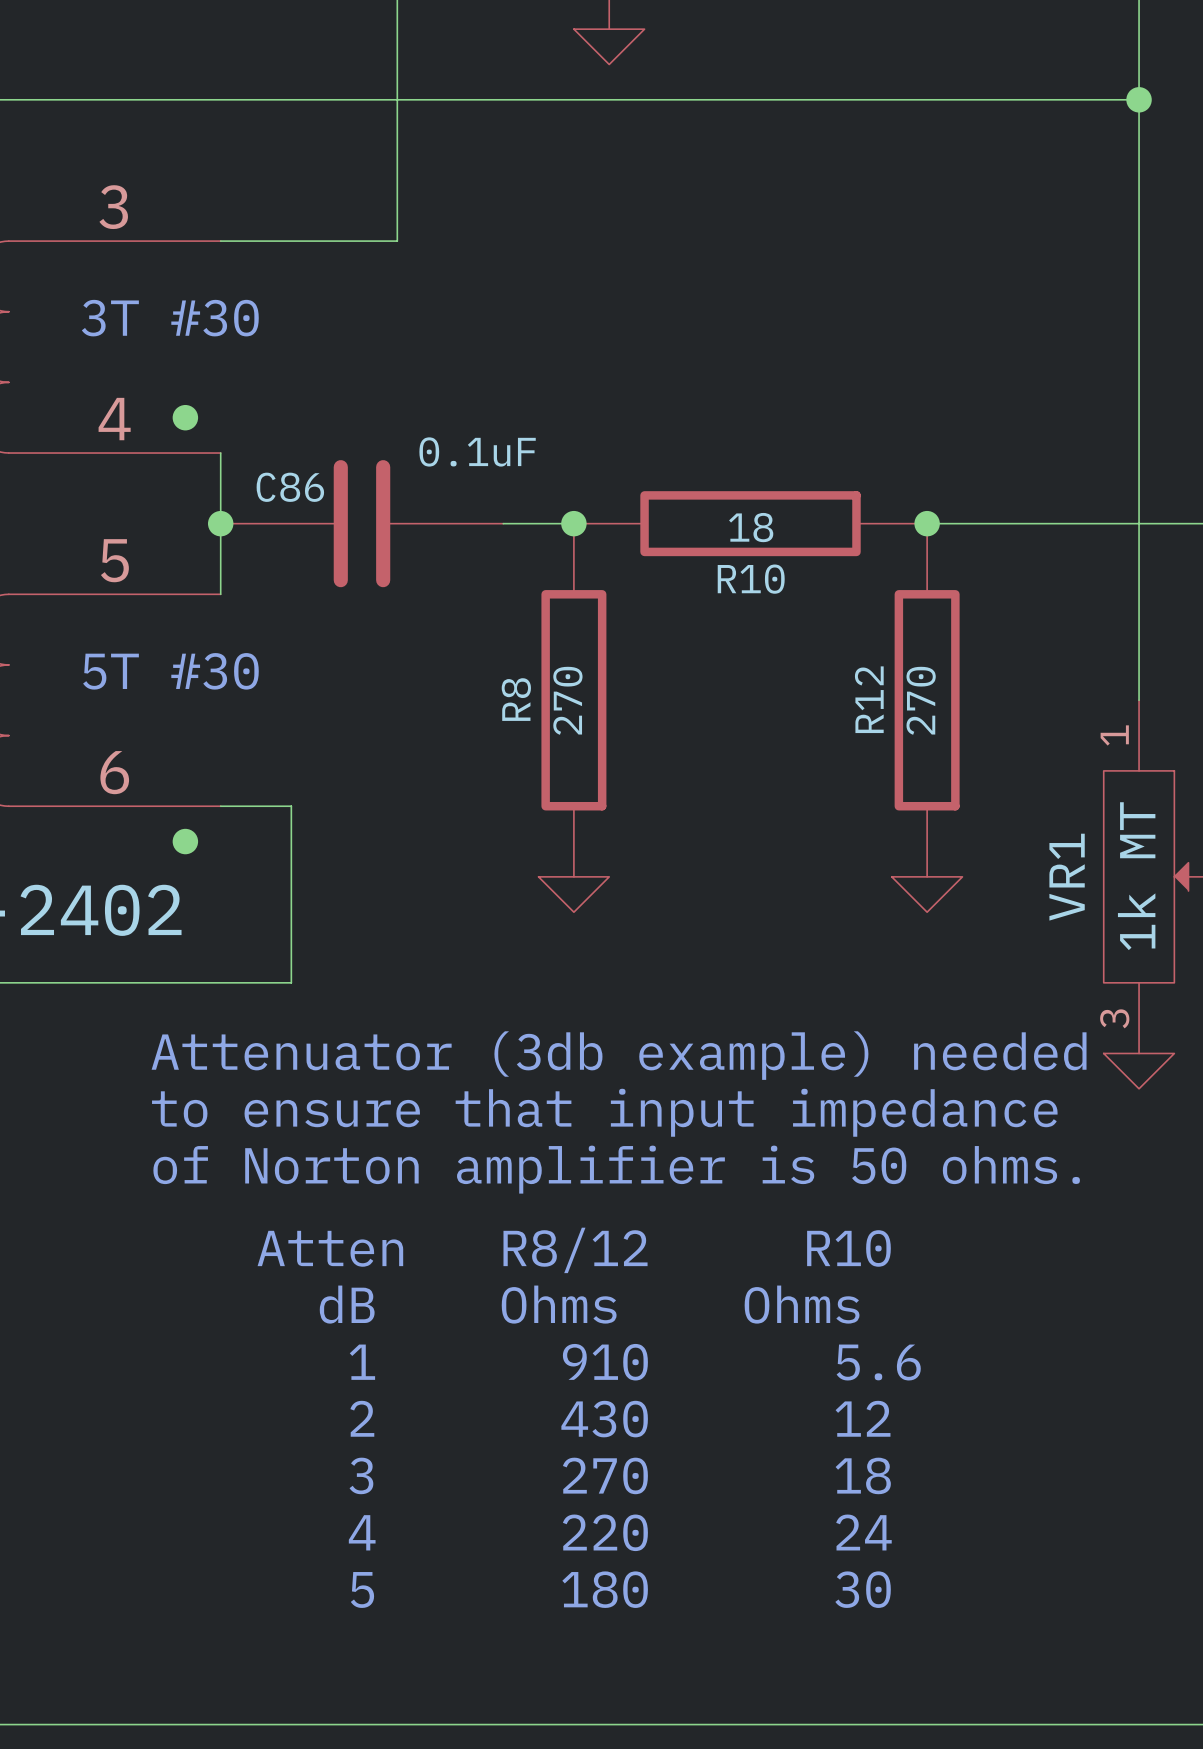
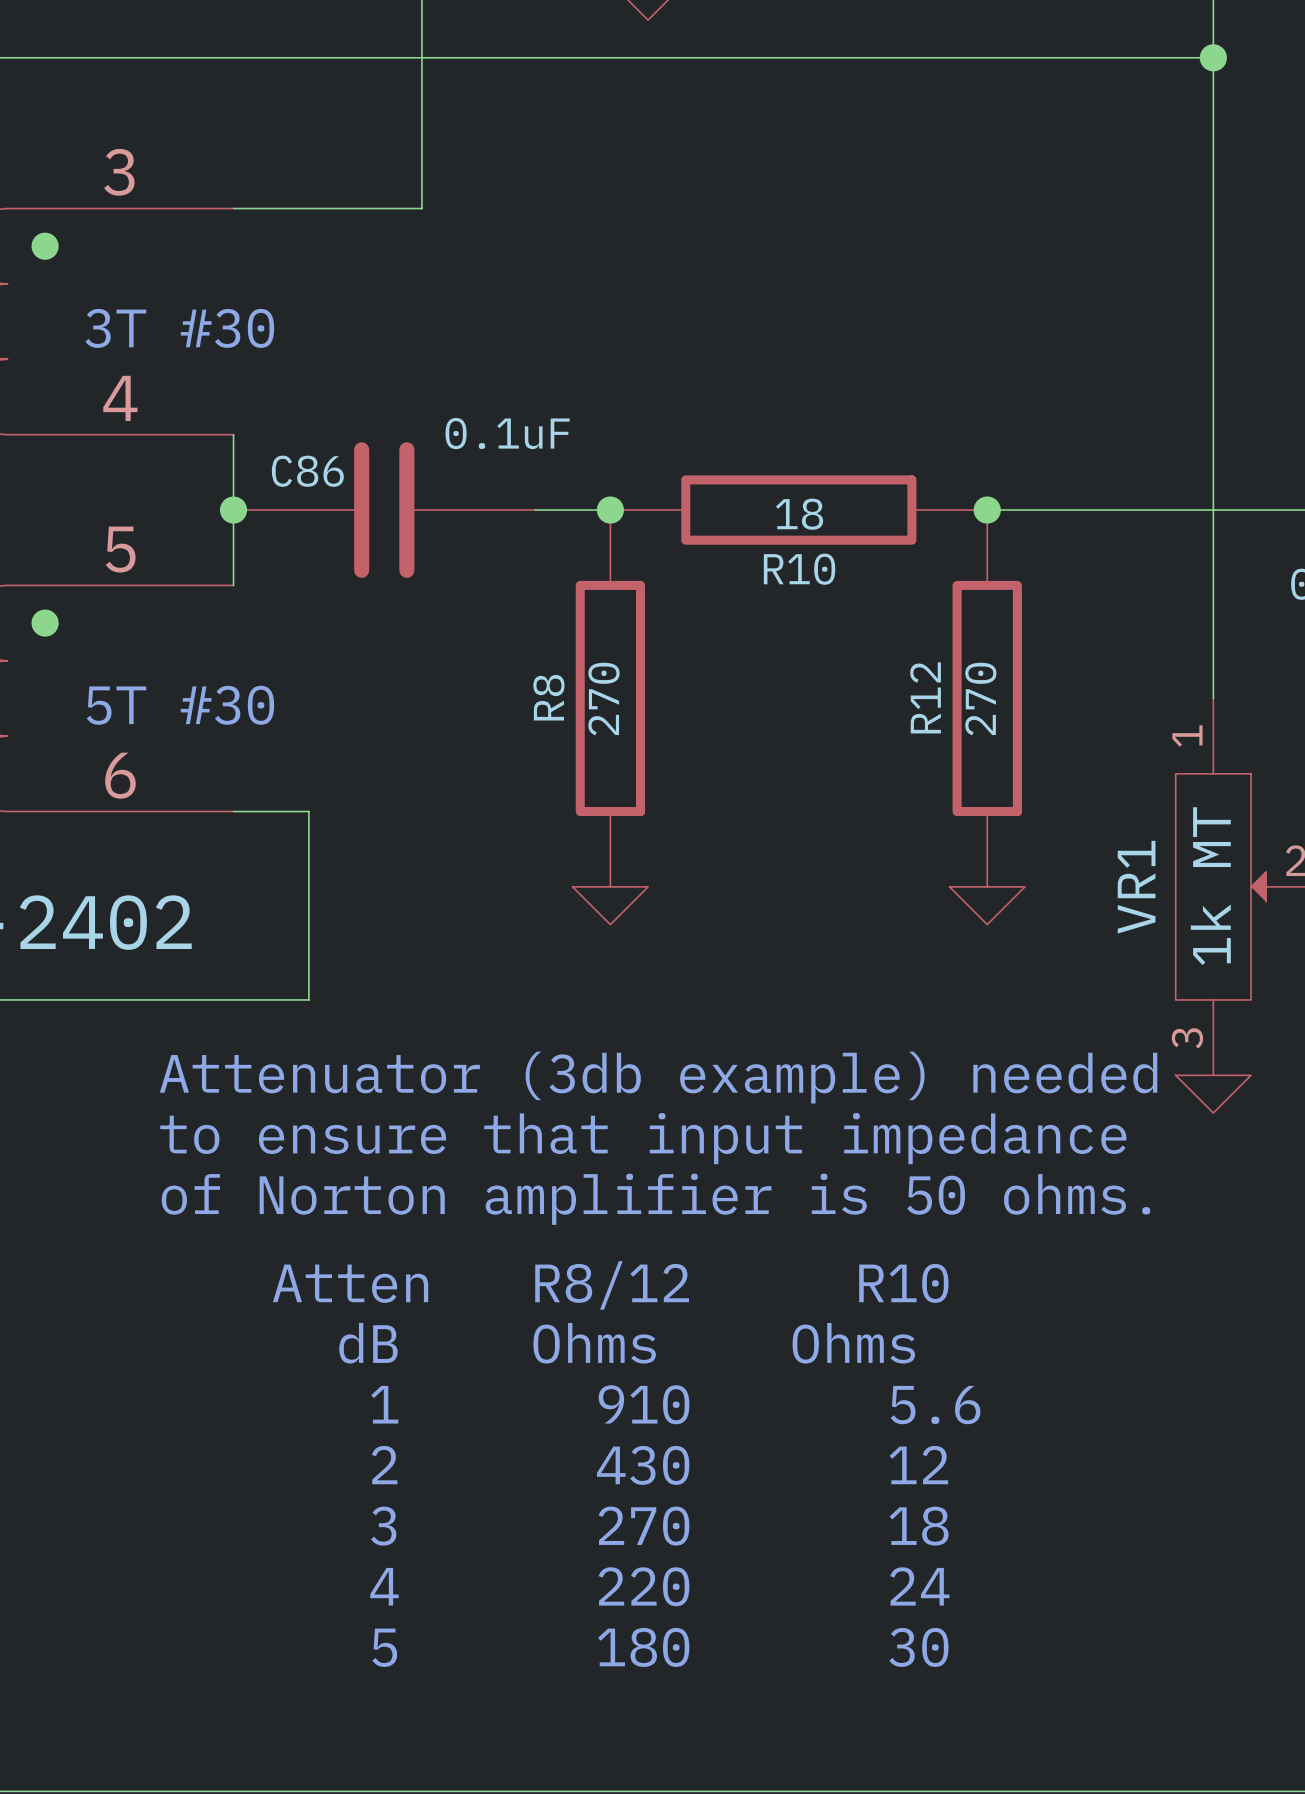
junction: none -> (45, 246)
text position: 3T #30 (170, 318) -> 3T #30 (179, 328)
junction: (185, 417) -> none
junction: none -> (45, 623)
text position: 5T #30 (170, 671) -> 5T #30 (180, 705)
junction: (185, 841) -> none

